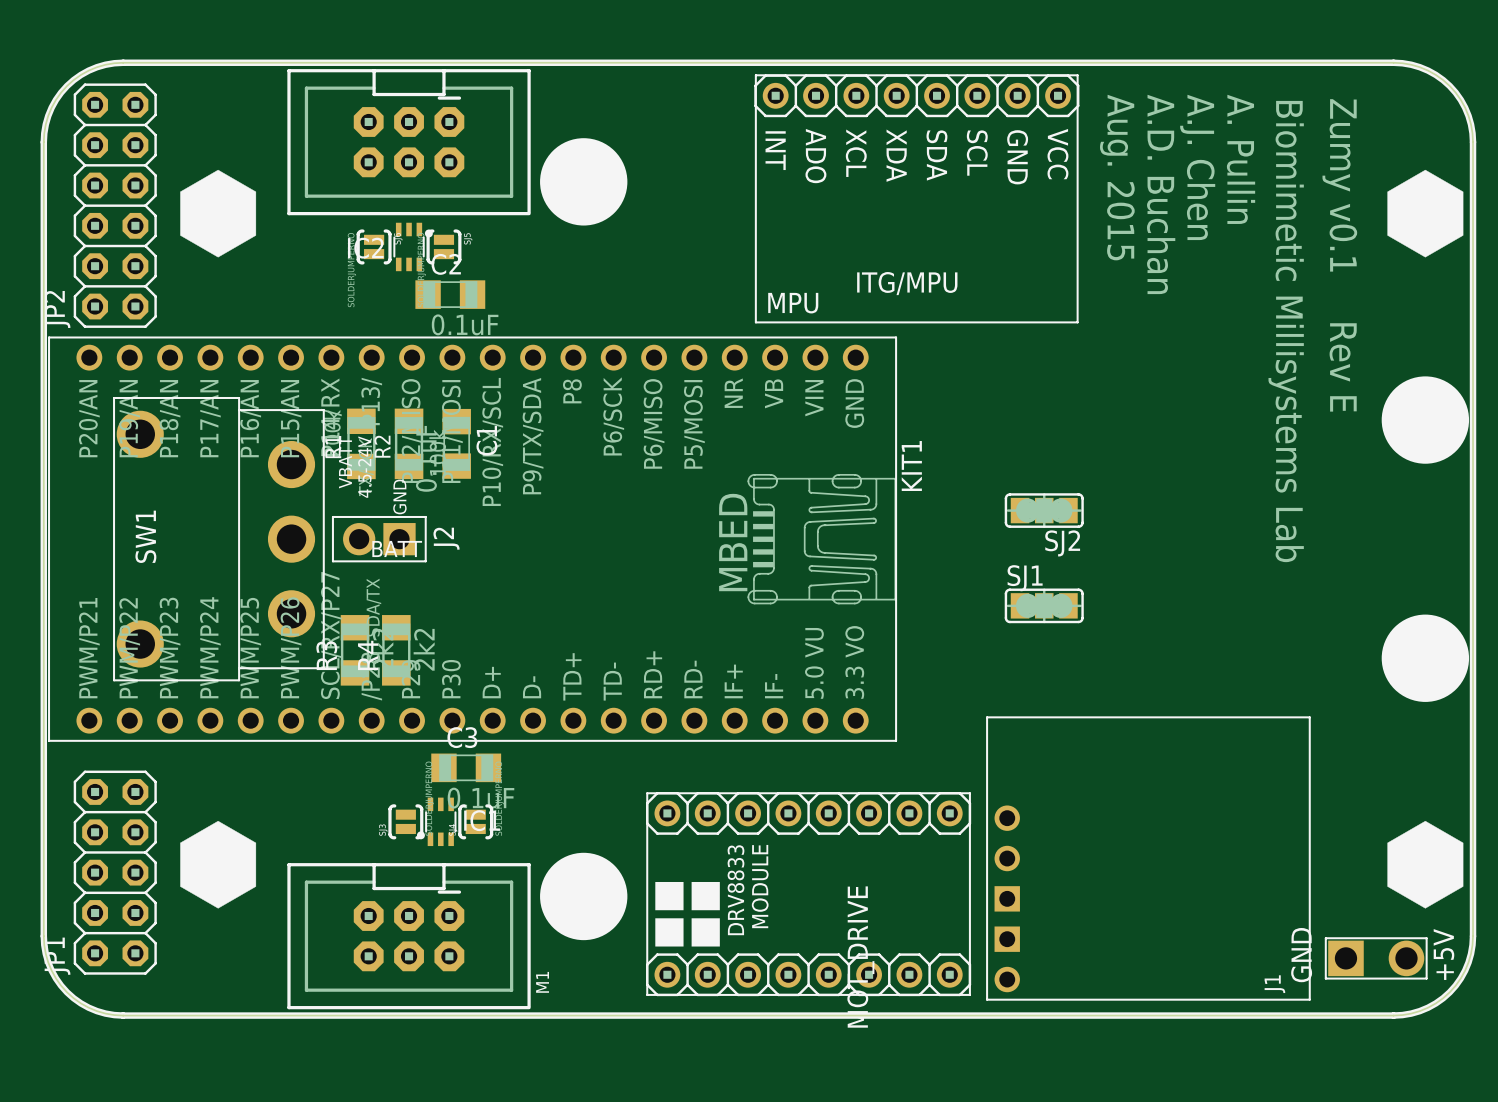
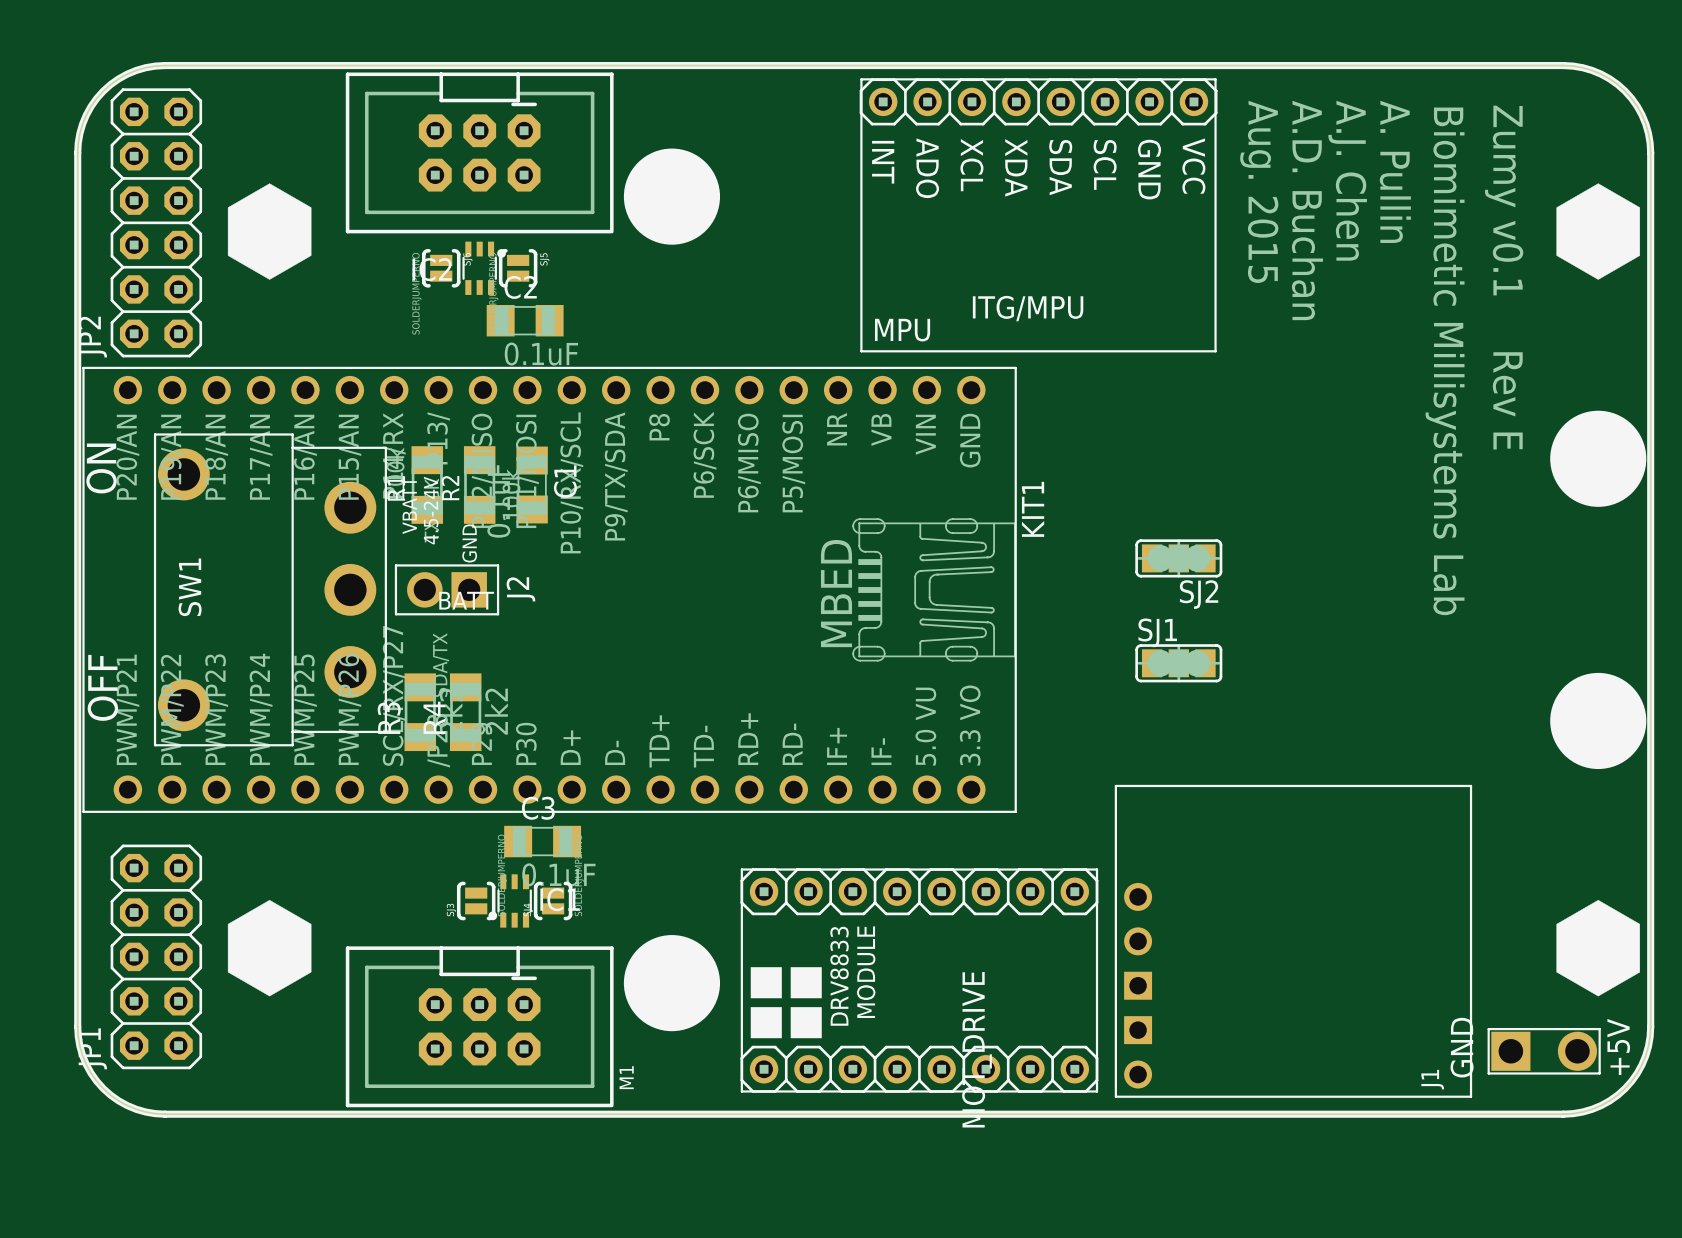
text: none -> ON (101, 468)
text: none -> OFF (102, 687)

